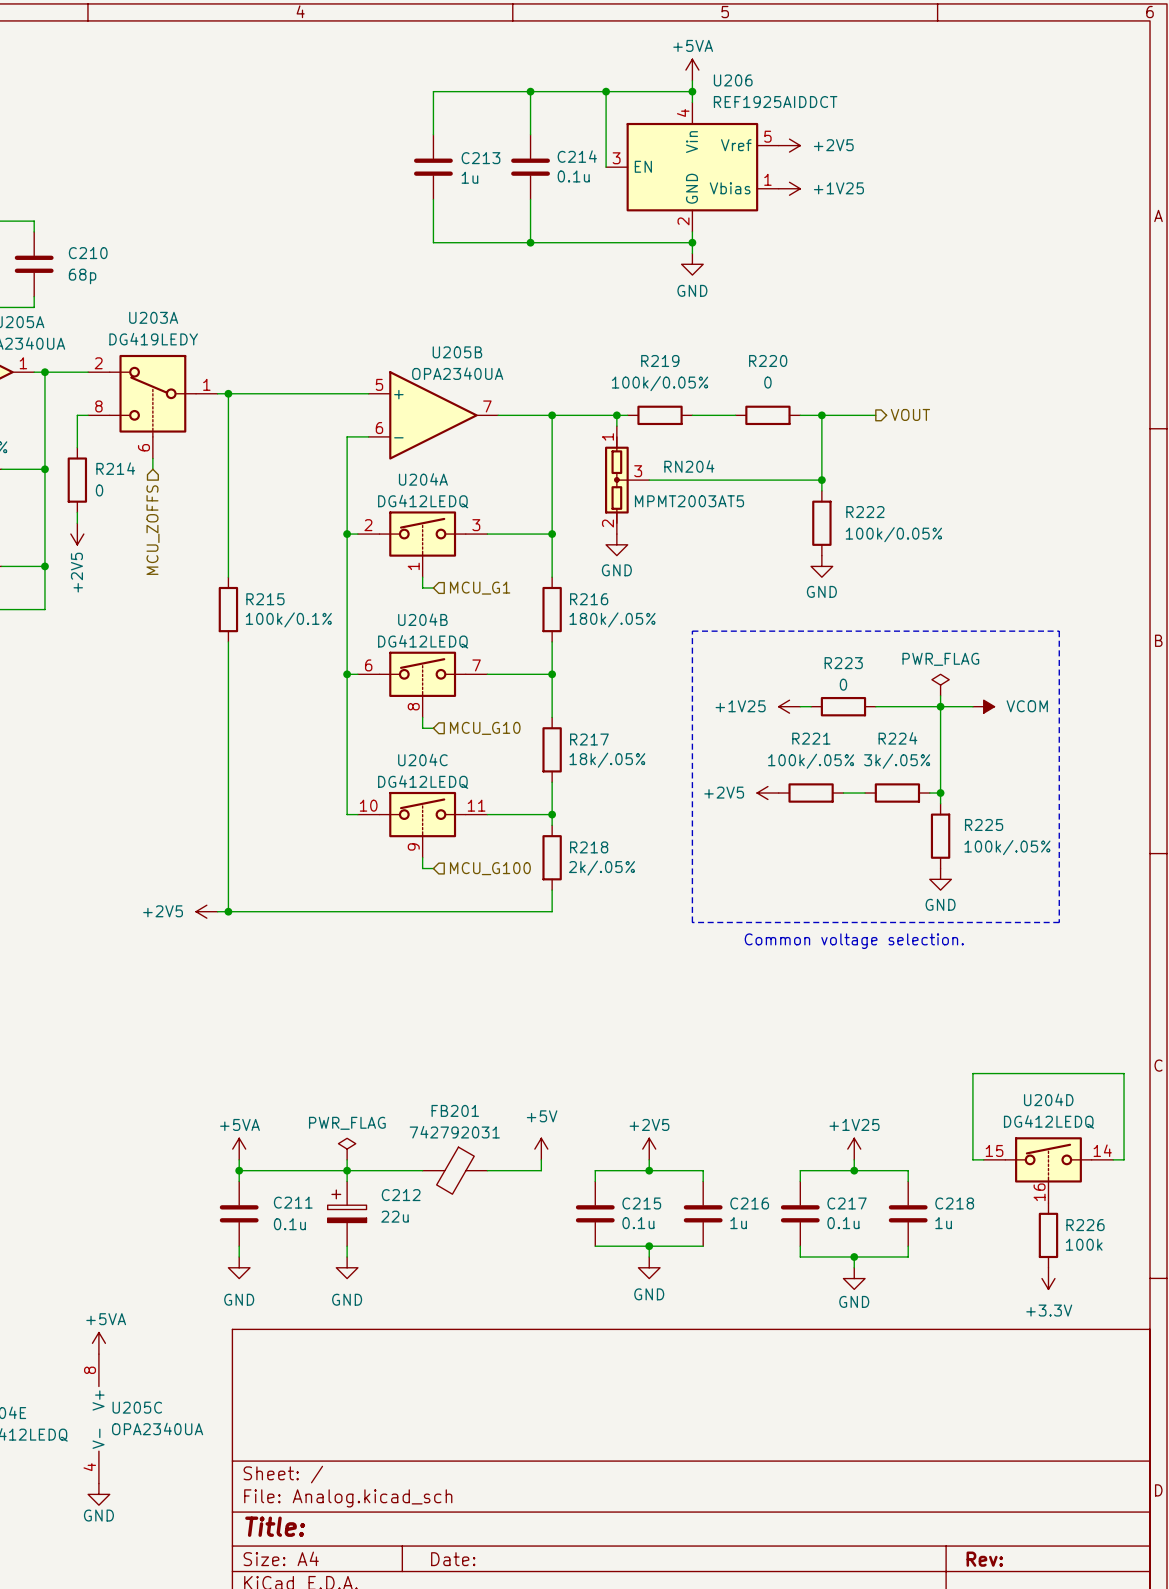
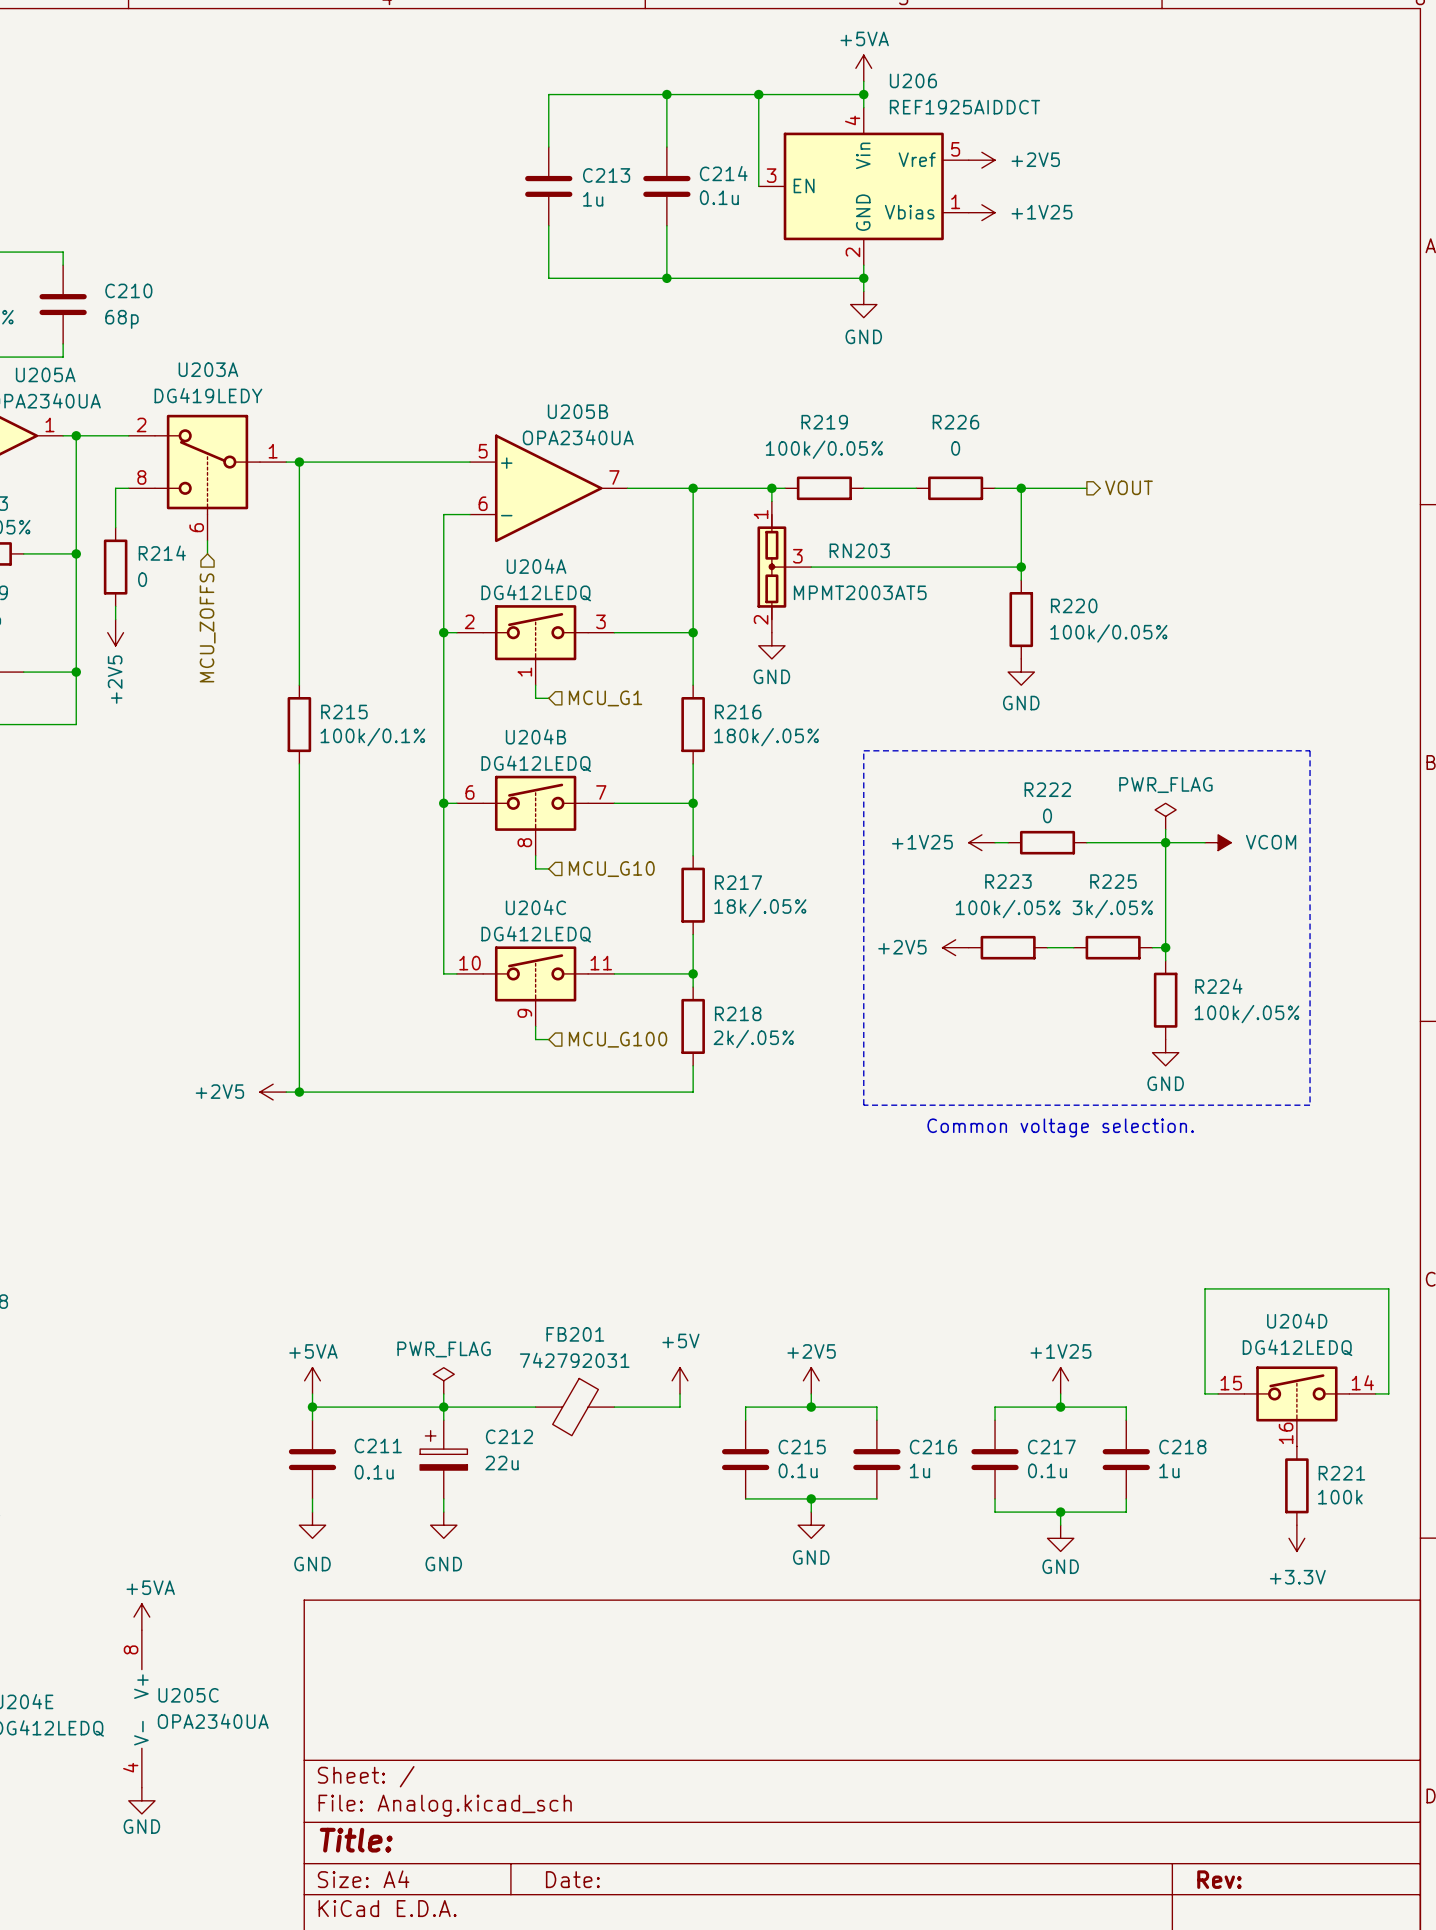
R220 name: R220 (768, 360) -> R226 (955, 422)
RN204 name: RN204 (689, 466) -> RN203 (859, 550)
R222 name: R222 (865, 512) -> R220 (1074, 605)
R223 name: R223 (843, 663) -> R222 (1047, 789)
R221 name: R221 (811, 738) -> R223 (1008, 881)
R224 name: R224 (897, 738) -> R225 (1113, 881)
R225 name: R225 (984, 824) -> R224 (1218, 986)
R226 name: R226 (1085, 1225) -> R221 (1341, 1473)

